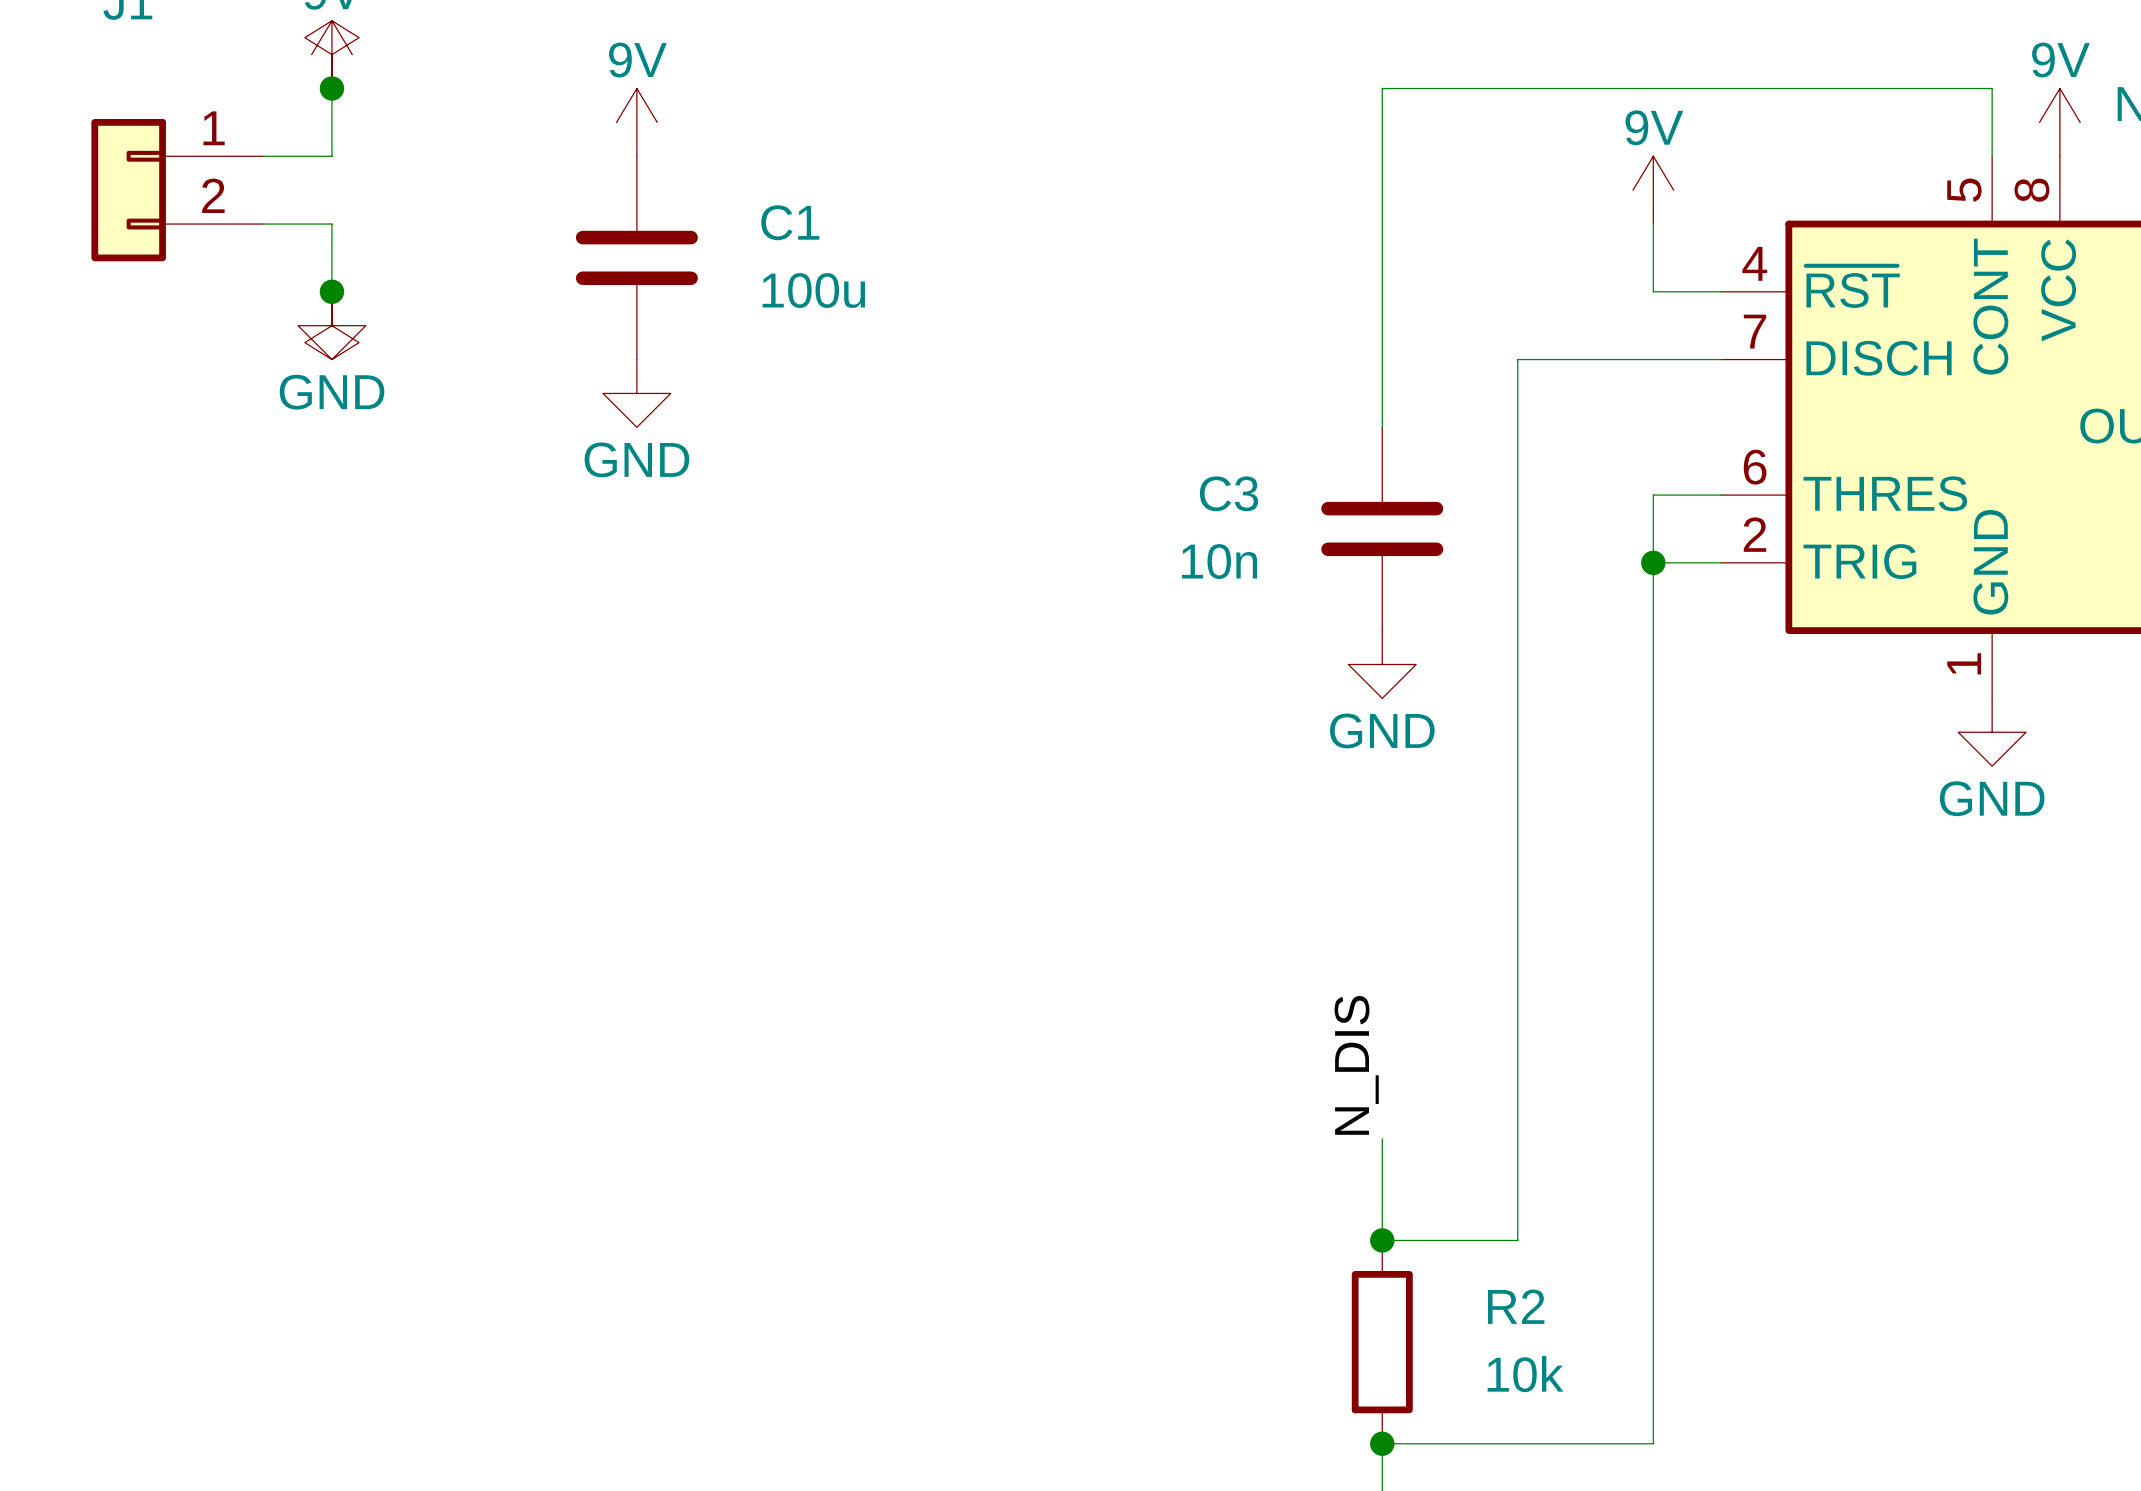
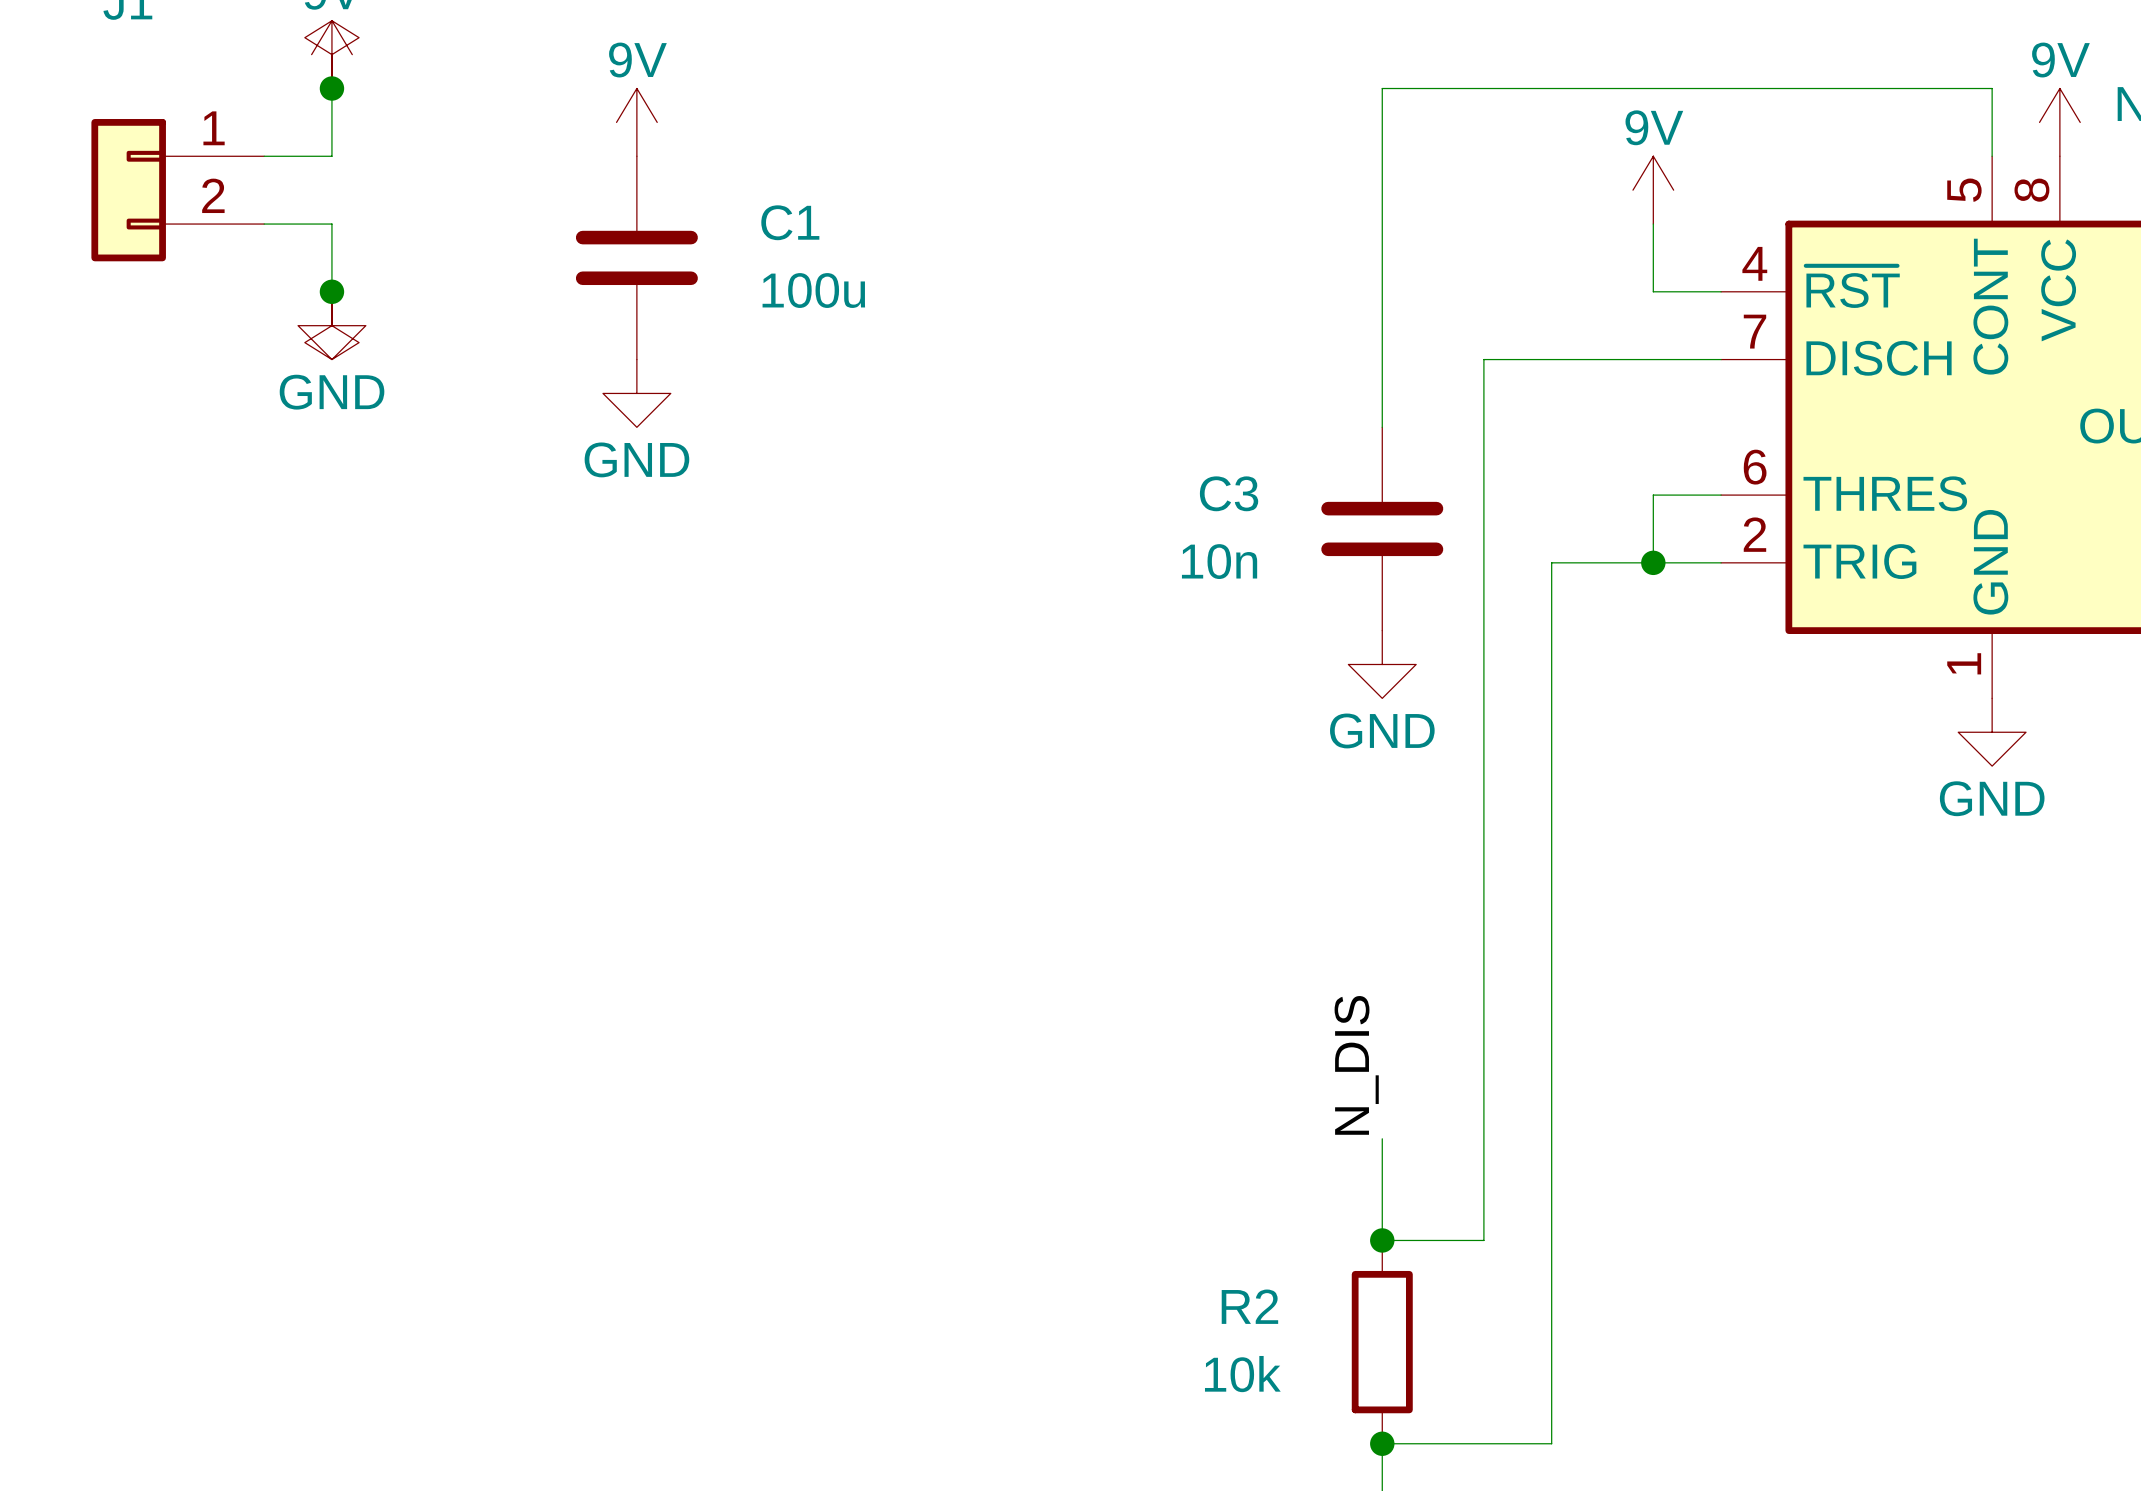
wire: (1517, 359) (1517, 1240) (1483, 1240) -> (1517, 359) (1483, 359) (1483, 1240)
wire: (1653, 562) (1653, 1443) (1551, 1443) -> (1653, 562) (1551, 562) (1551, 1443)
R2 name position: R2 (1516, 1306) -> R2 (1249, 1306)
R2 value position: 10k (1525, 1374) -> 10k (1242, 1374)

